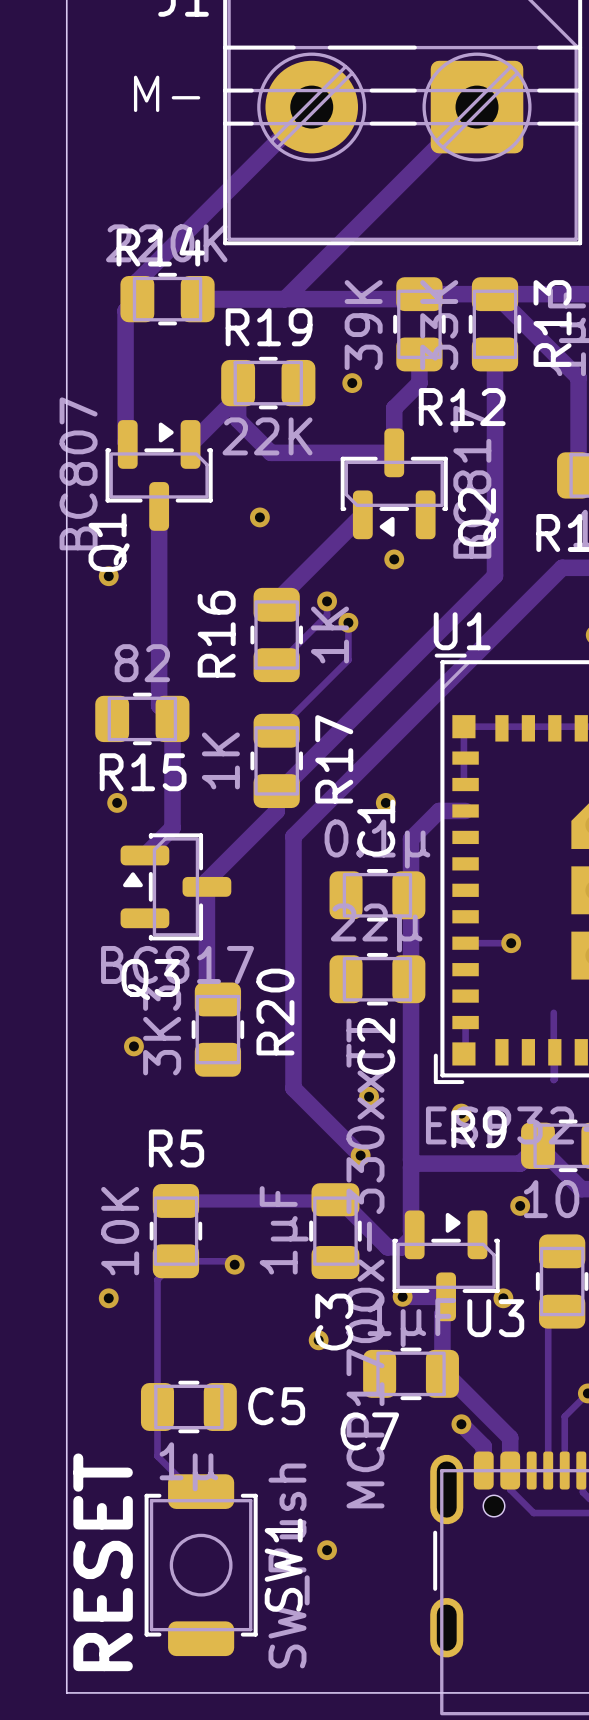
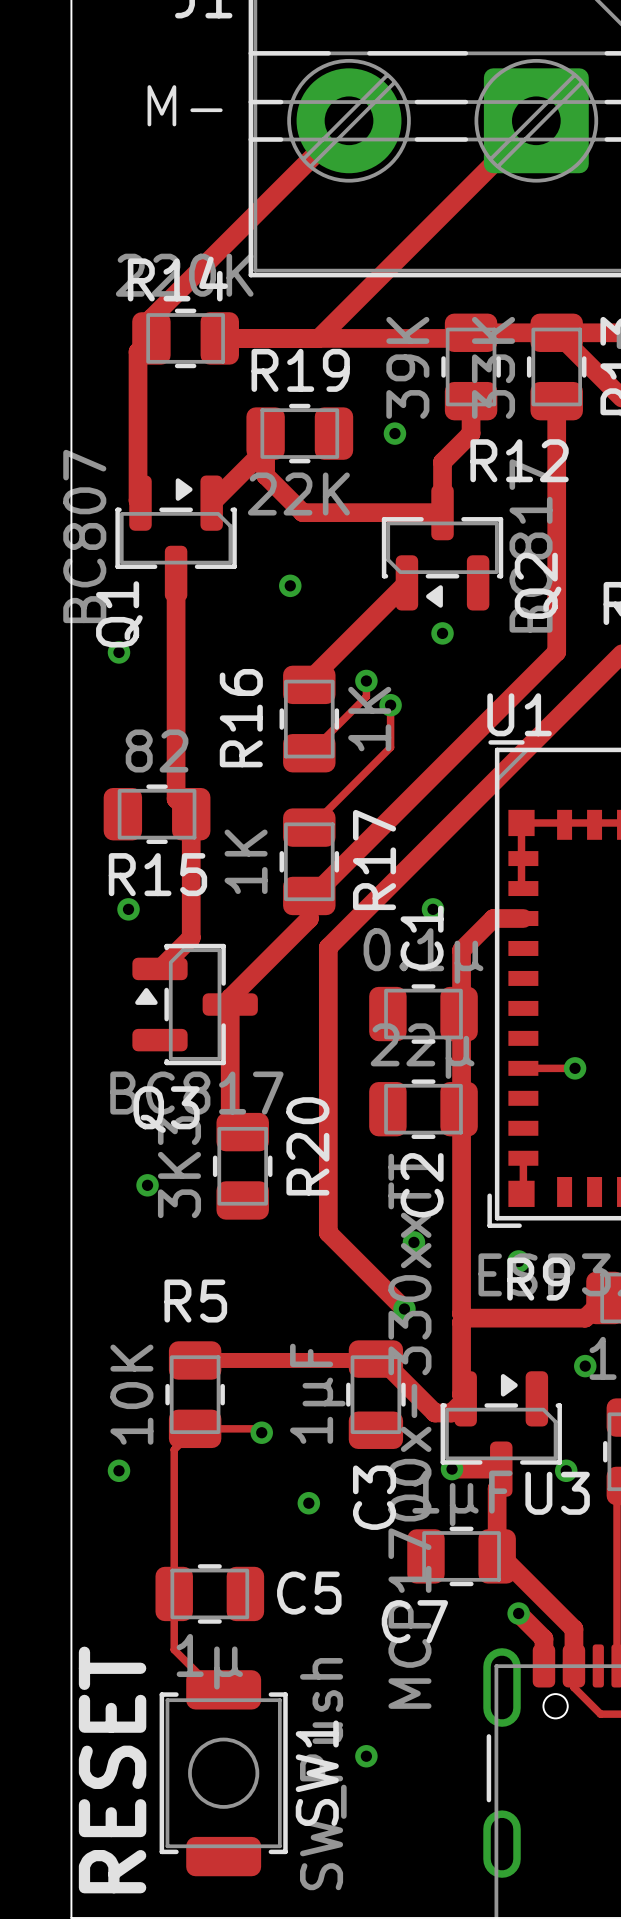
via position: (318, 1340) -> (308, 1503)

